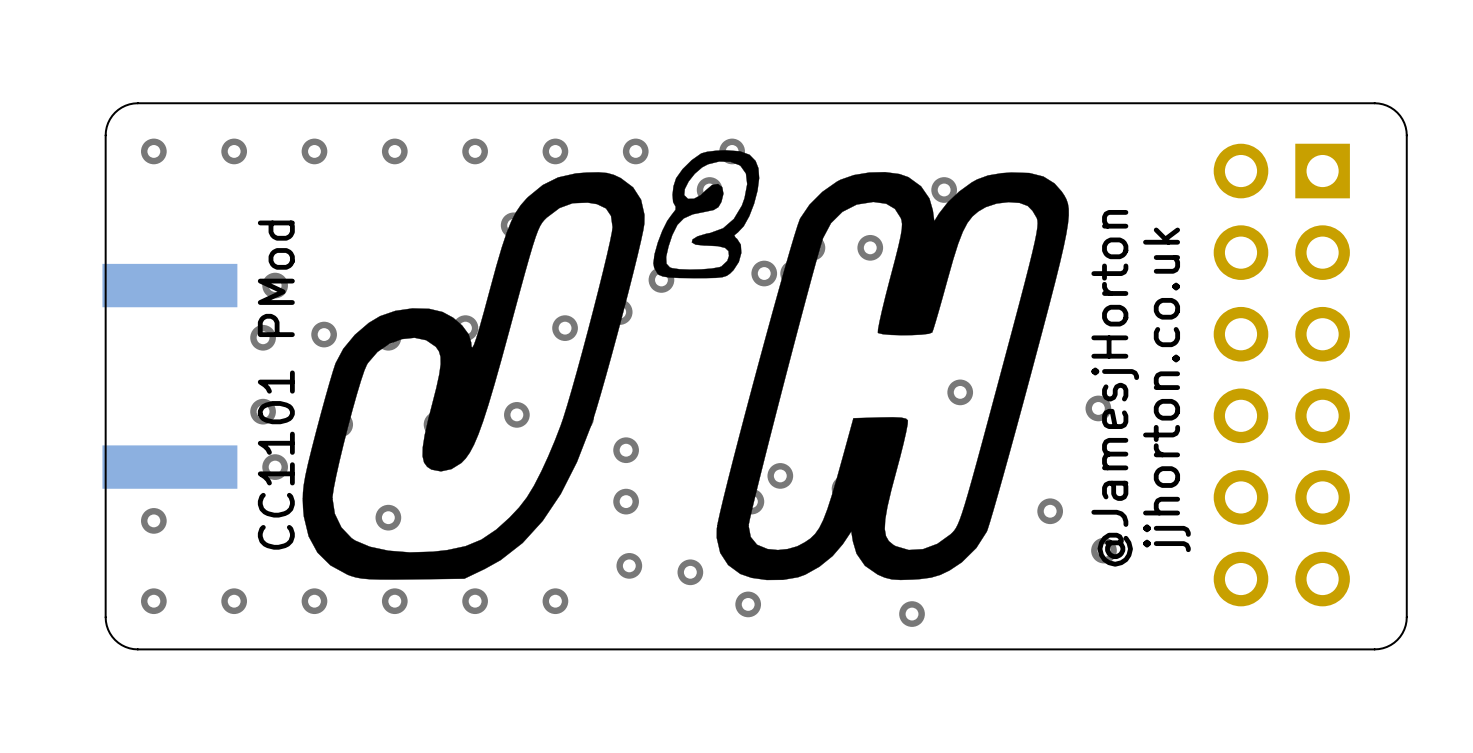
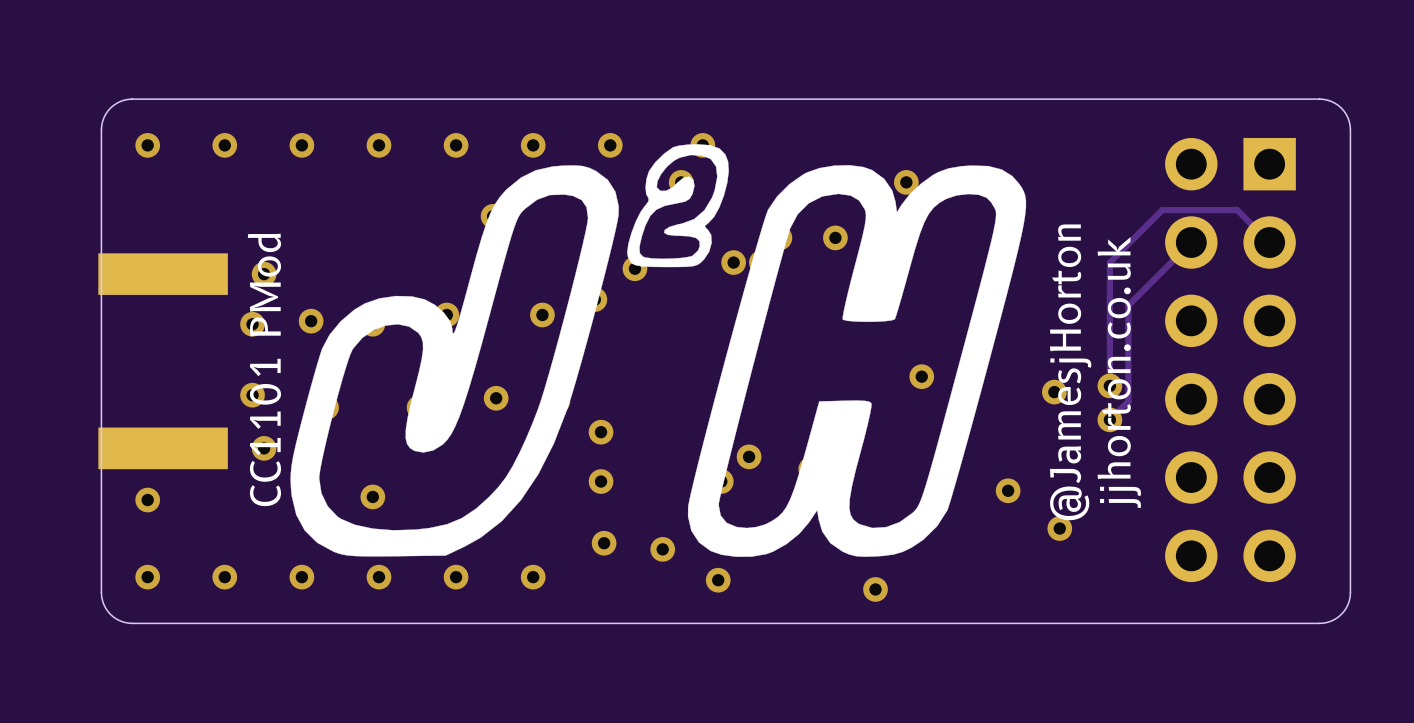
track: none -> (1191, 242) (1128, 305) (1128, 401) (1109, 419)
track: none -> (1269, 242) (1237, 210) (1162, 210) (1109, 262) (1109, 385)
via: none -> (1109, 385)
via: none -> (1109, 419)

